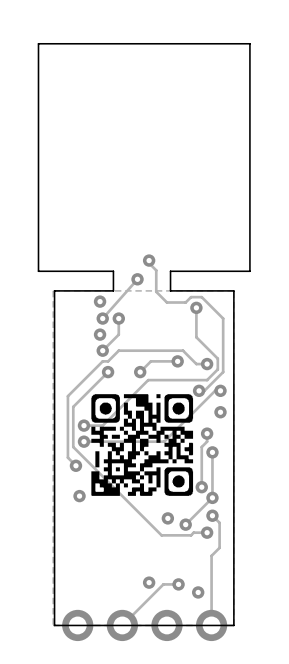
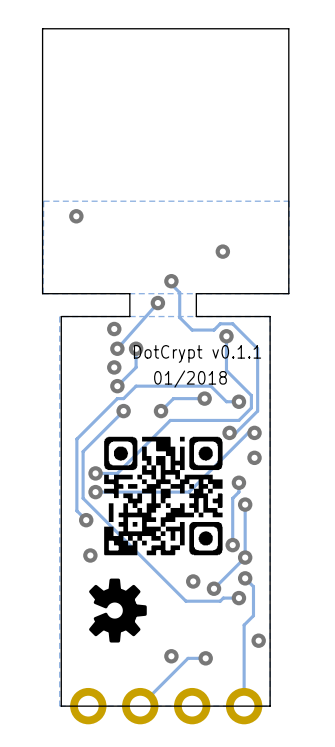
zone outline: none -> (289, 201) (43, 201) (43, 293) (288, 293) (289, 201)
via: none -> (76, 216)
via: none -> (222, 251)
text: none -> DotCrypt v0.1.1 (197, 353)
text: none -> 01/2018 (190, 379)
drawing: none -> [89, 578, 147, 643]
via position: (198, 592) -> (258, 640)

